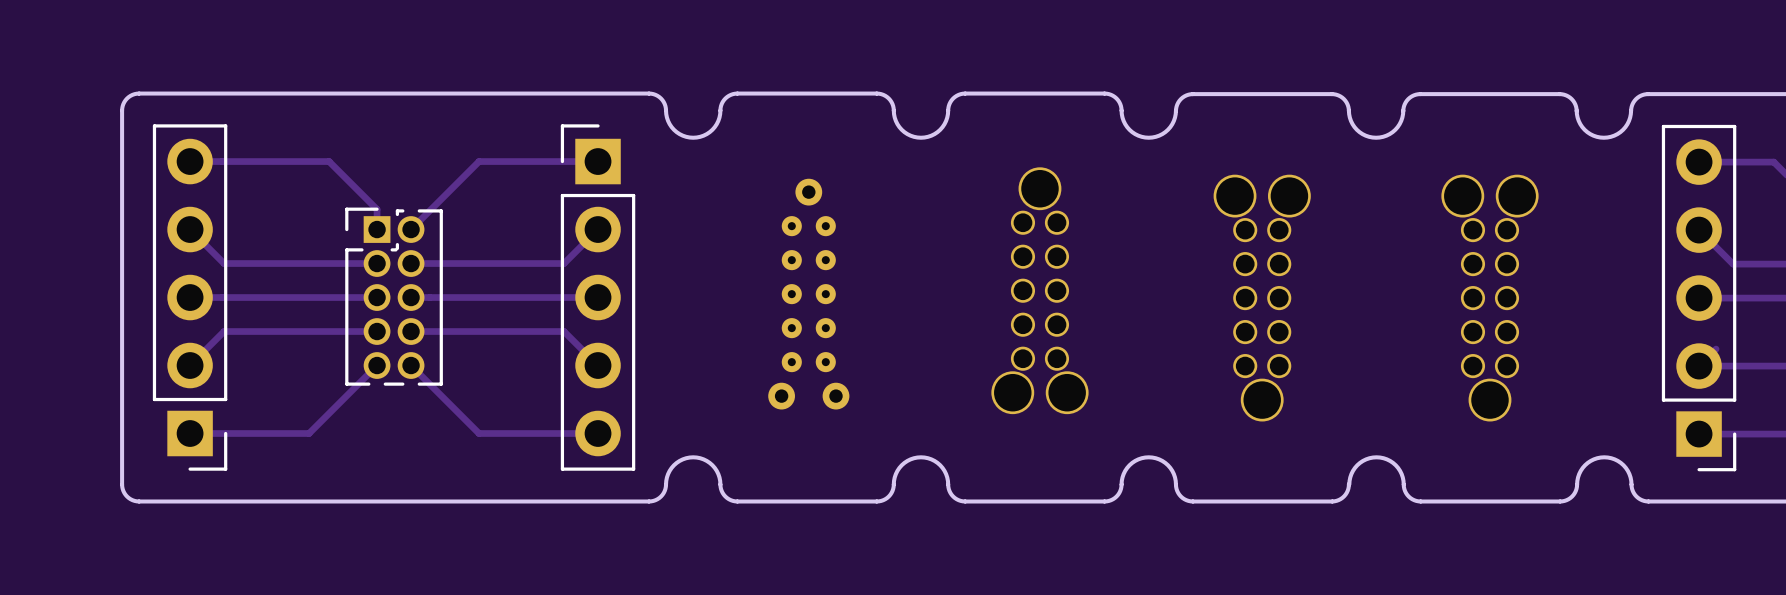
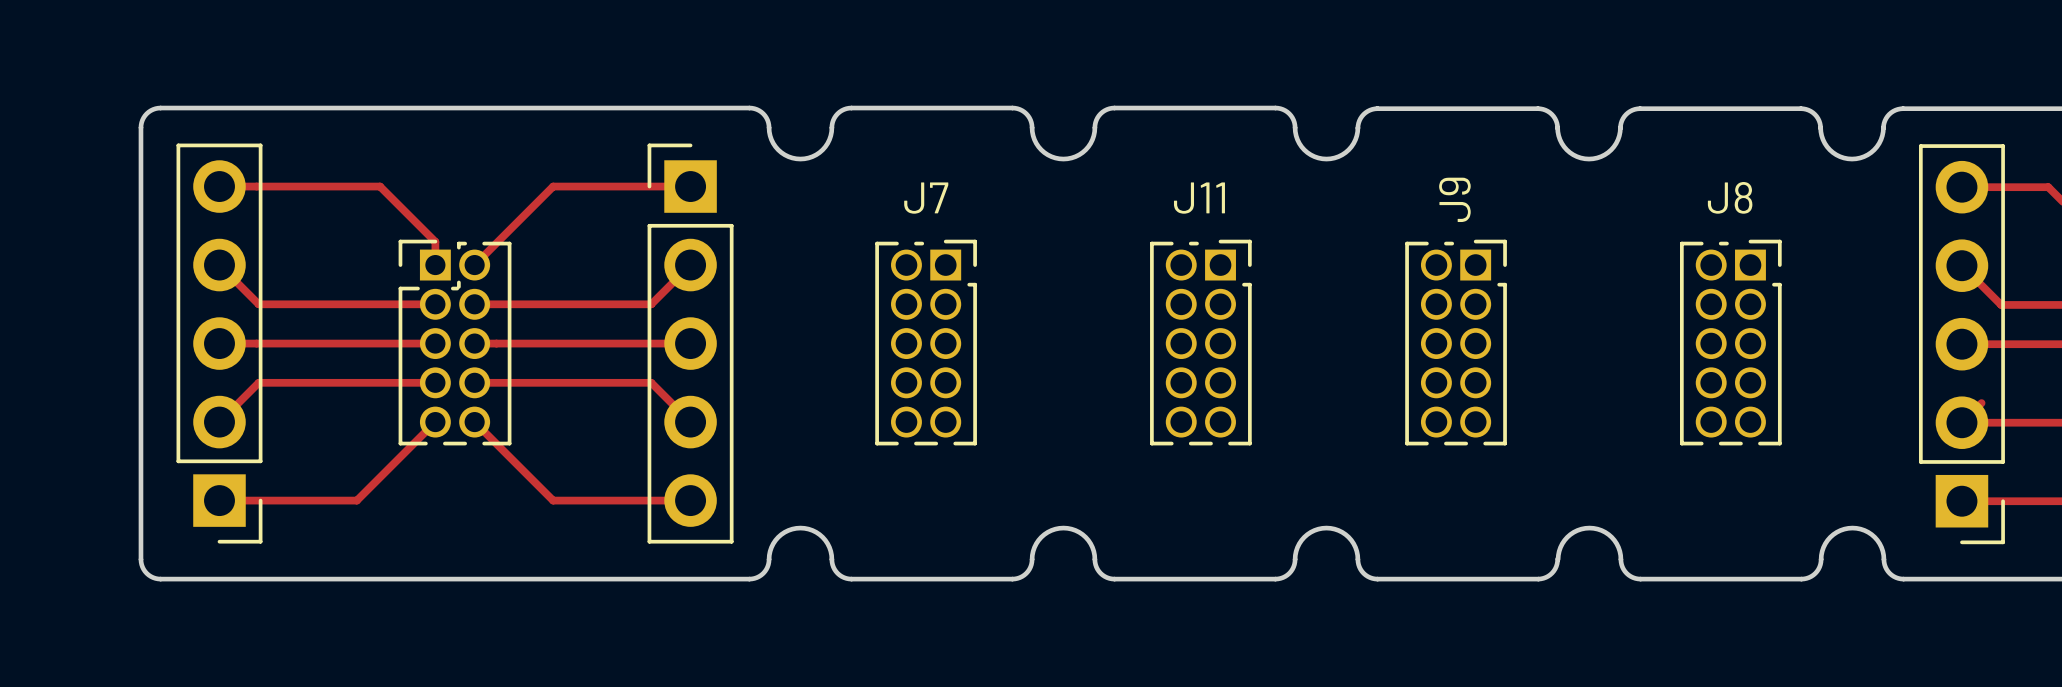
part: (1039, 290) -> none
part: (808, 294) -> none
J7: none -> (926, 342)
J11: none -> (1200, 342)
J9: none -> (1456, 342)
J8: none -> (1730, 342)
part: (1262, 298) -> none
part: (1489, 298) -> none

